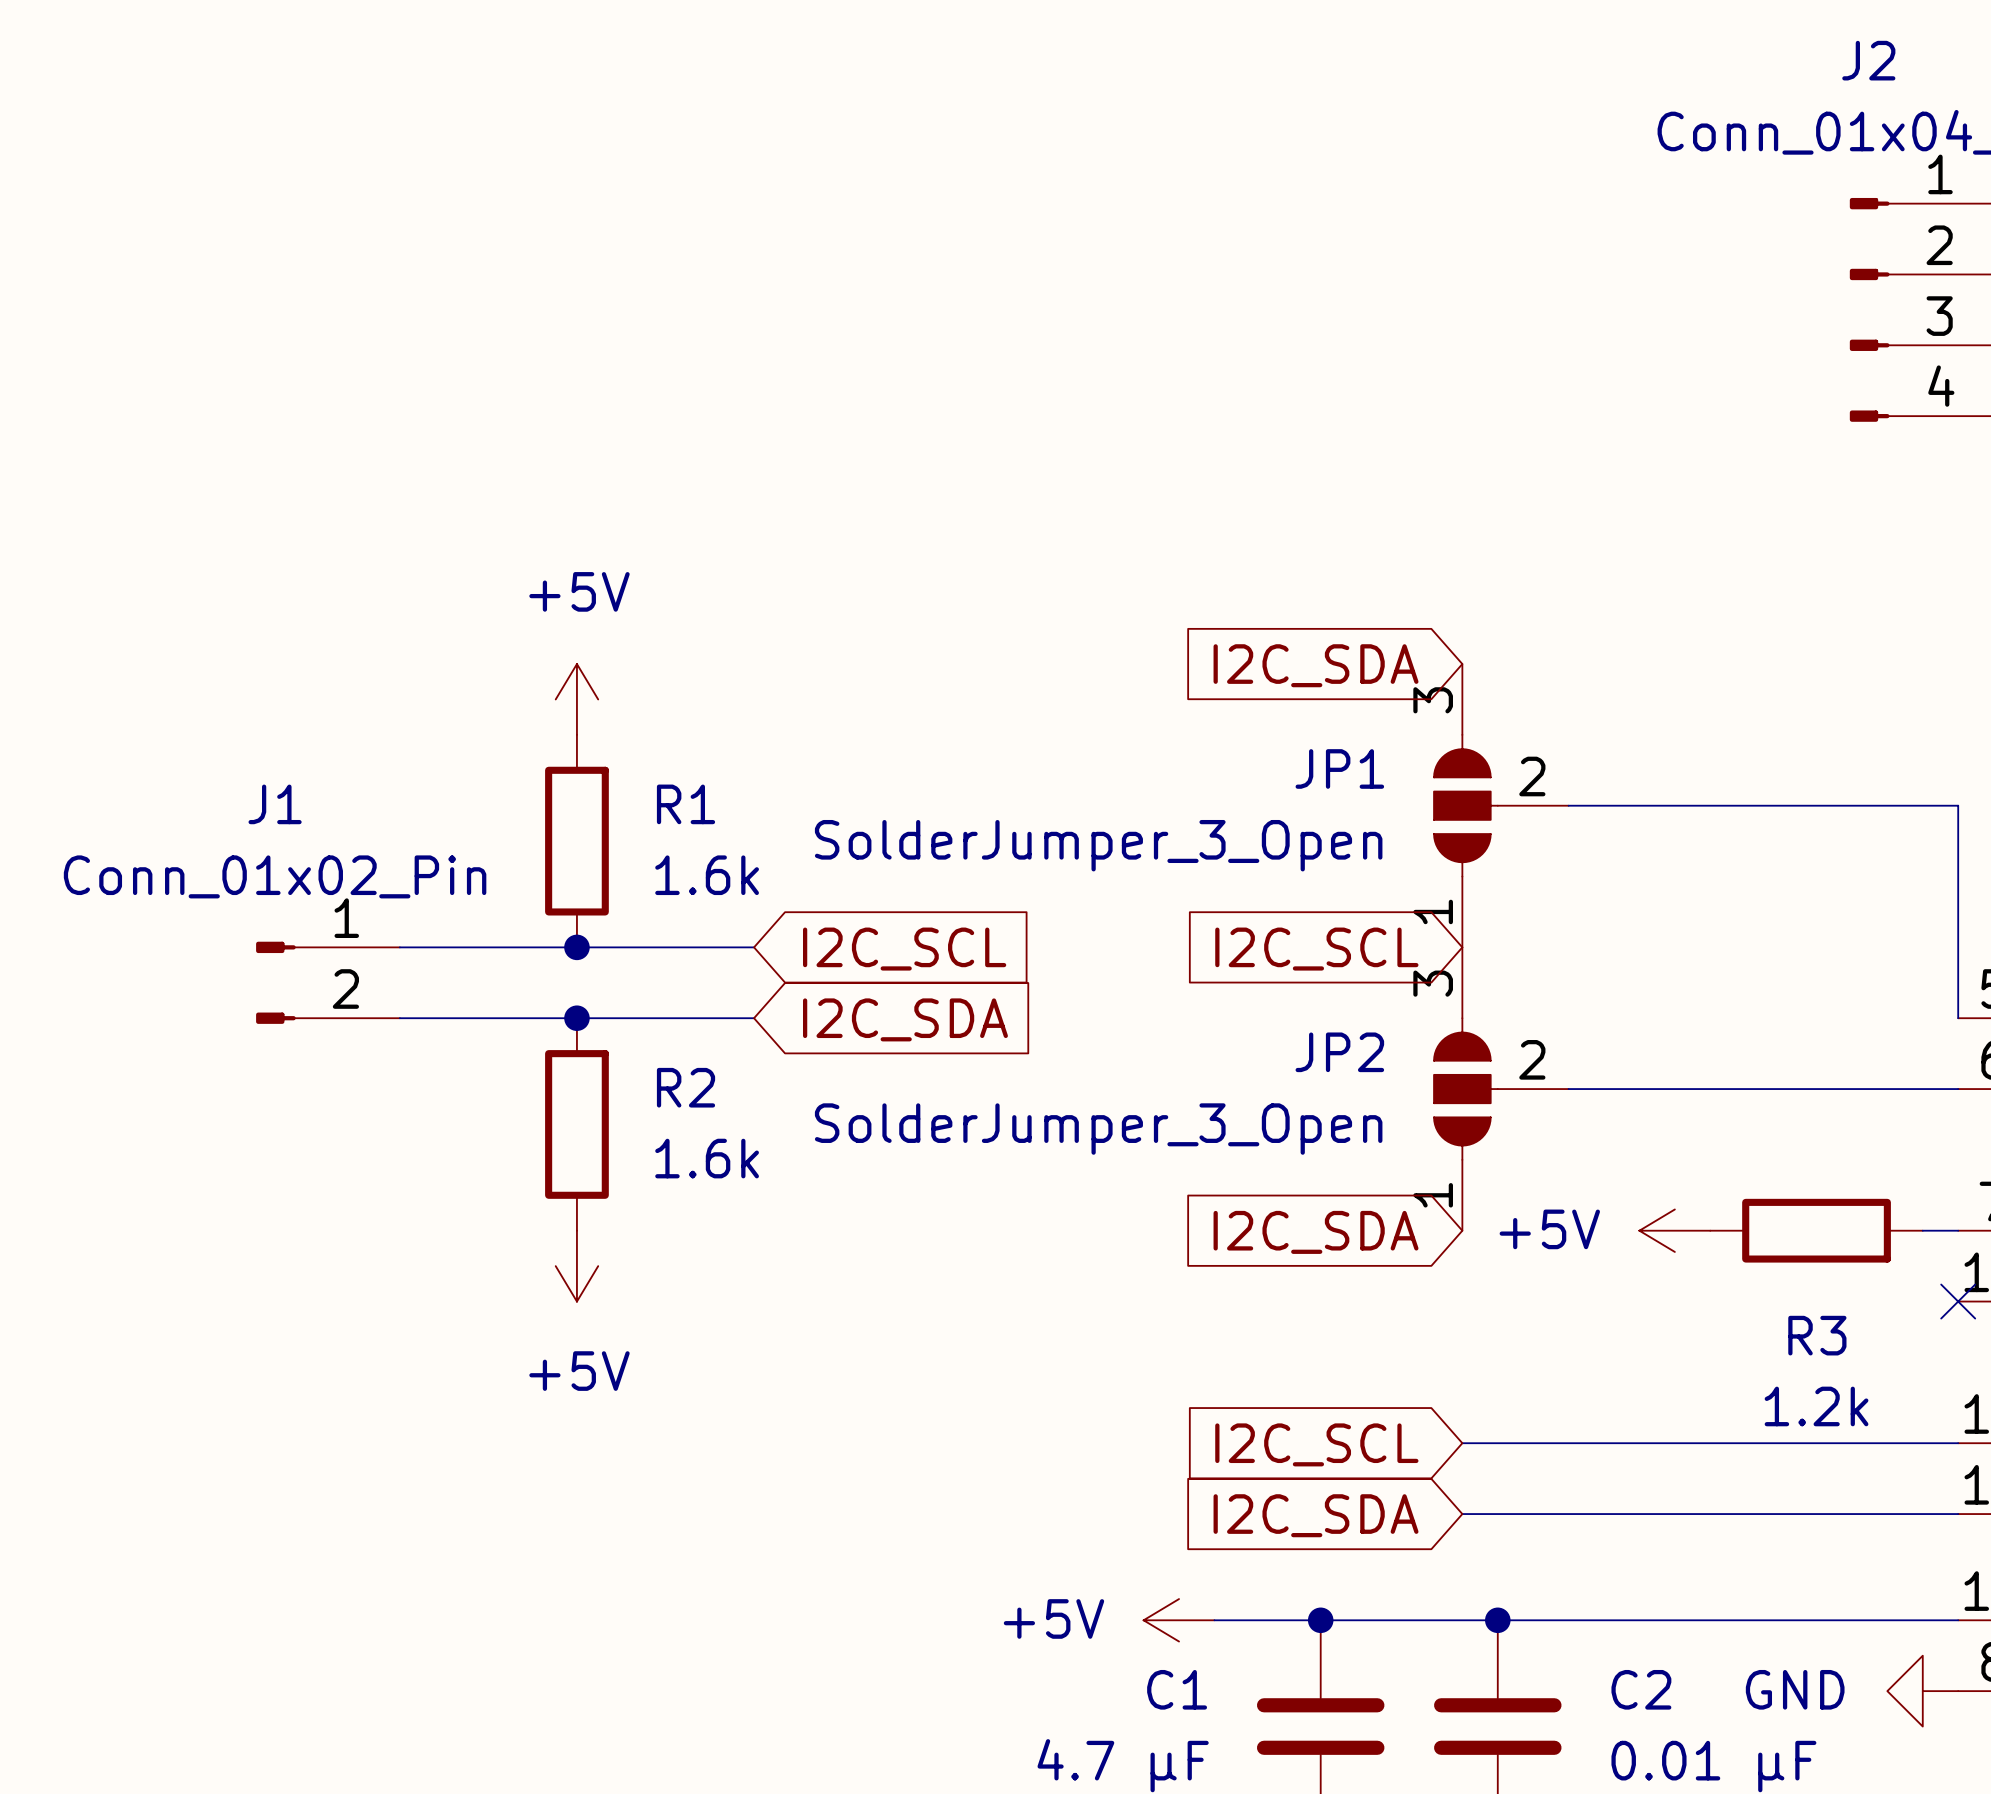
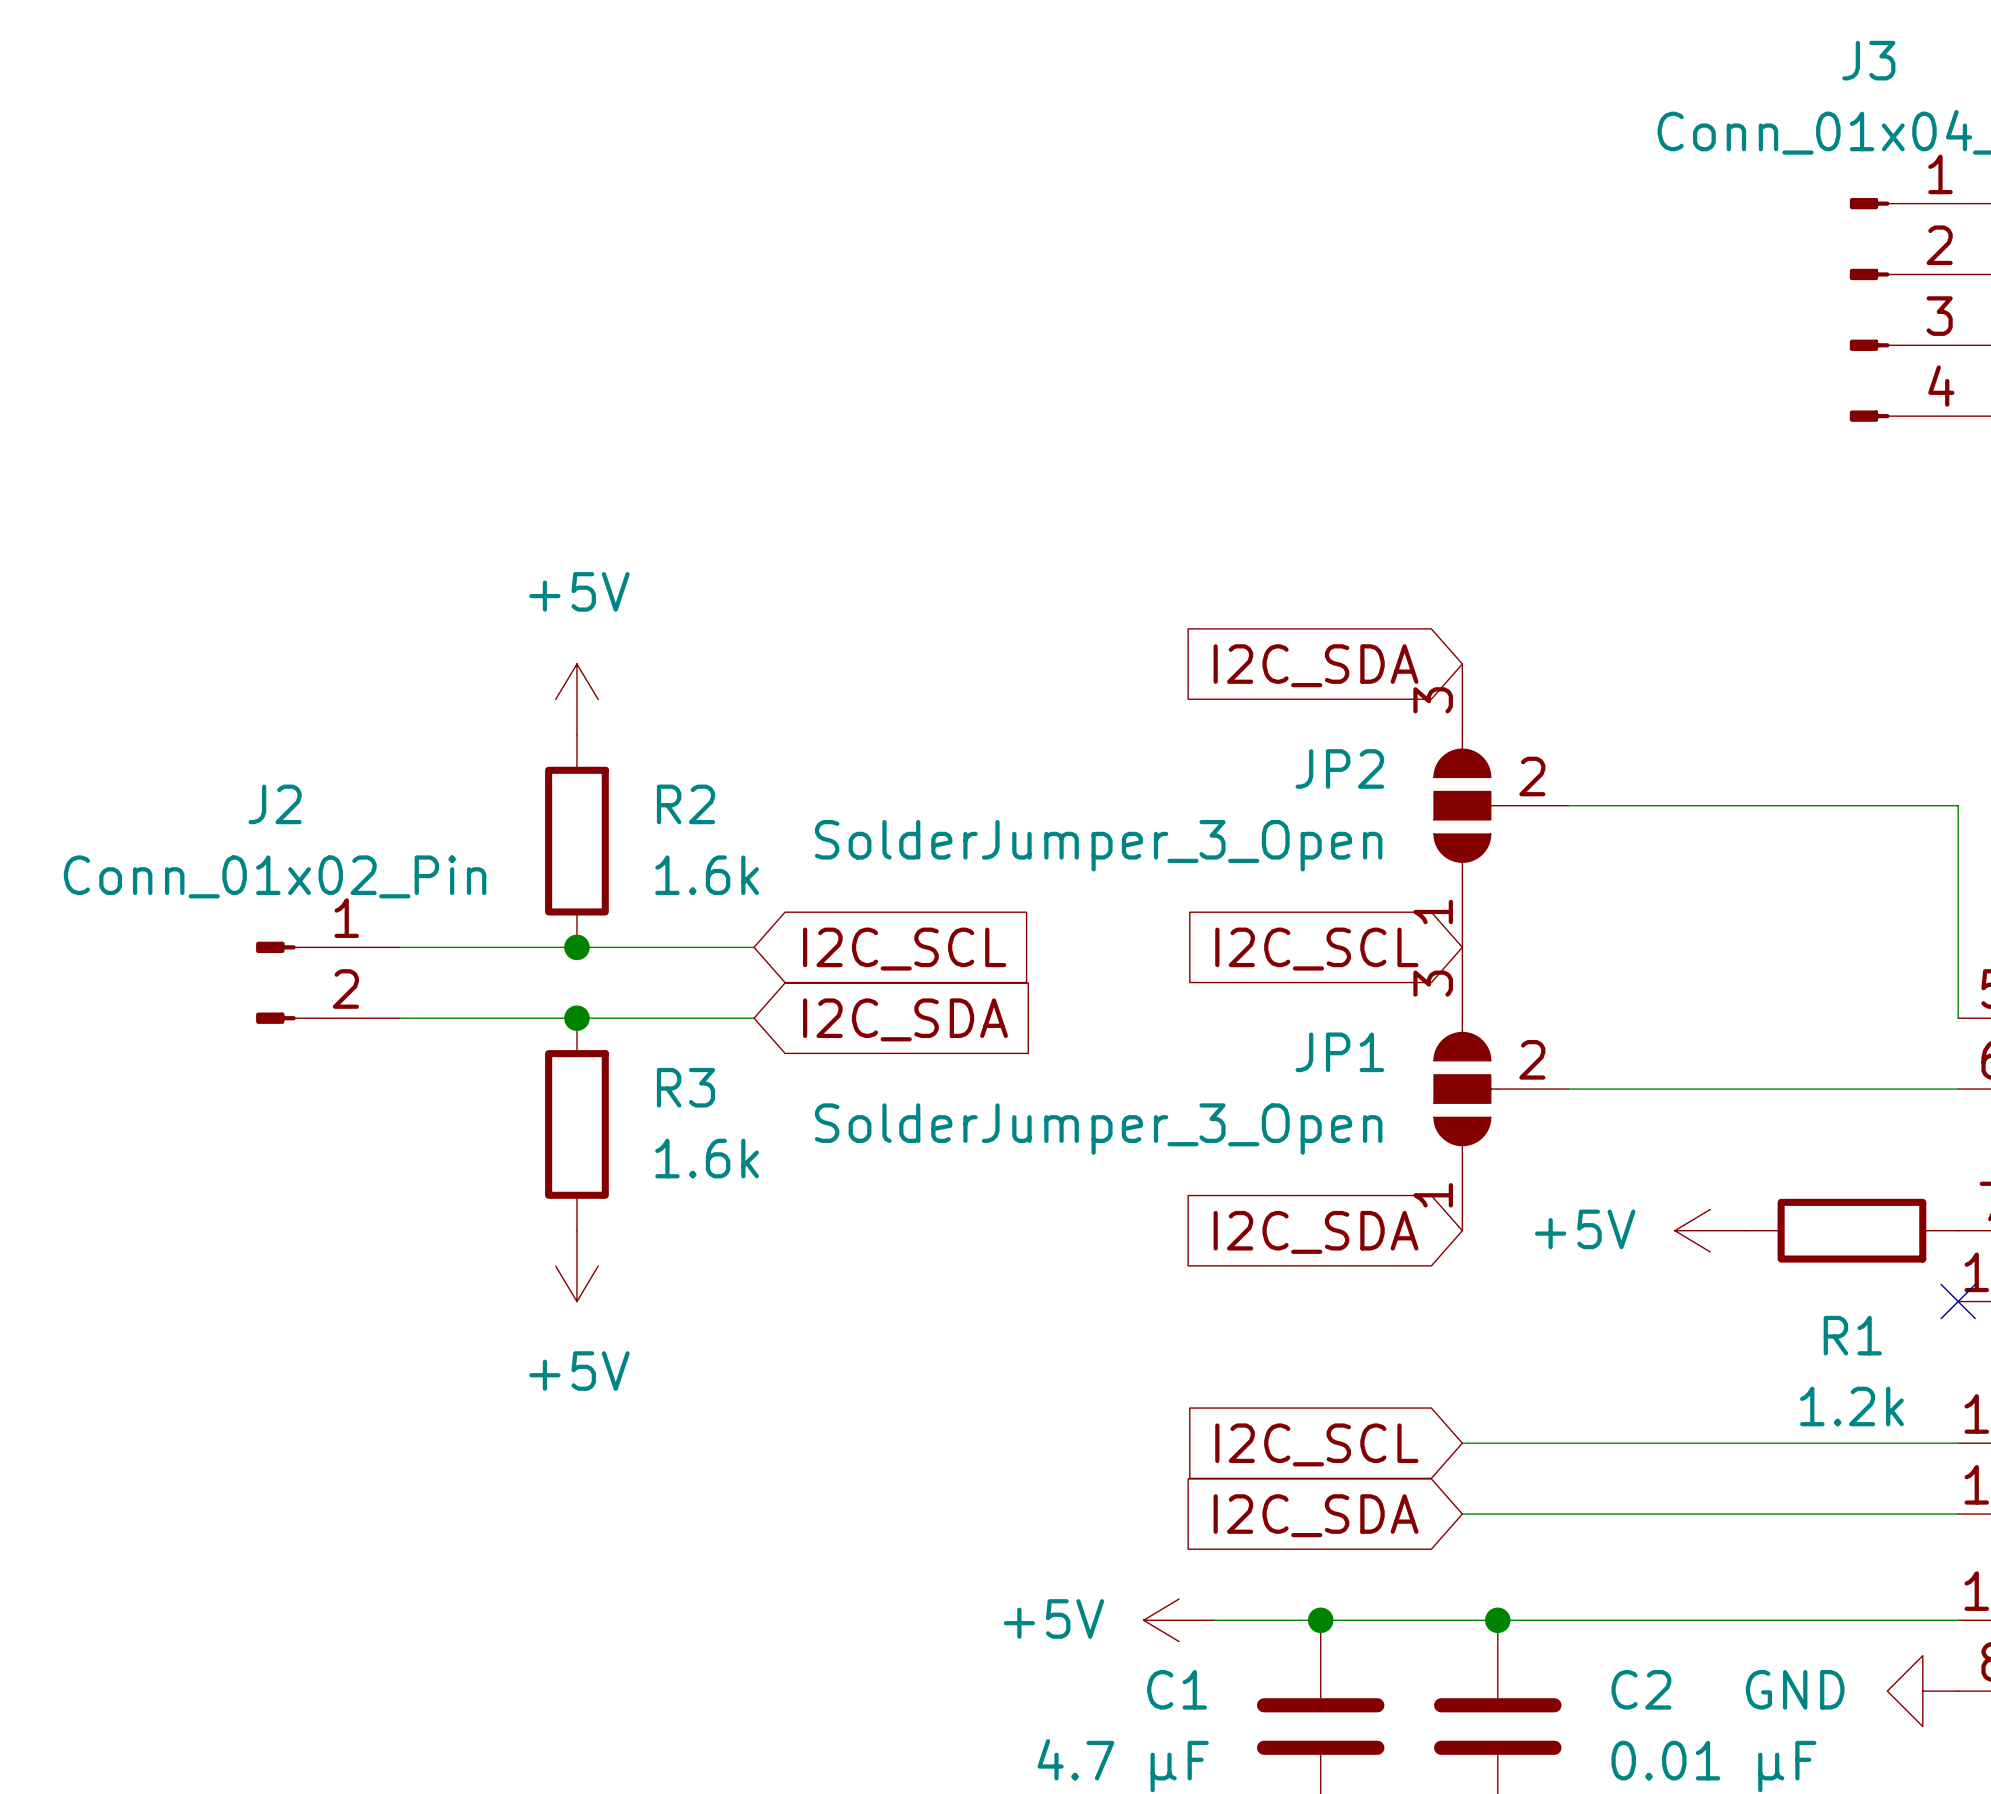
J2 name: J2 (1868, 60) -> J3 (1868, 60)
JP1 name: JP1 (1339, 768) -> JP2 (1339, 768)
J1 name: J1 (275, 804) -> J2 (275, 804)
R1 name: R1 (686, 804) -> R2 (686, 804)
JP2 name: JP2 (1339, 1052) -> JP1 (1339, 1052)
R2 name: R2 (686, 1087) -> R3 (686, 1087)
power symbol position: +5V (1674, 1230) -> +5V (1710, 1230)
R3: 1.2k (1816, 1230) -> none
R1: none -> 1.2k (1851, 1230)

